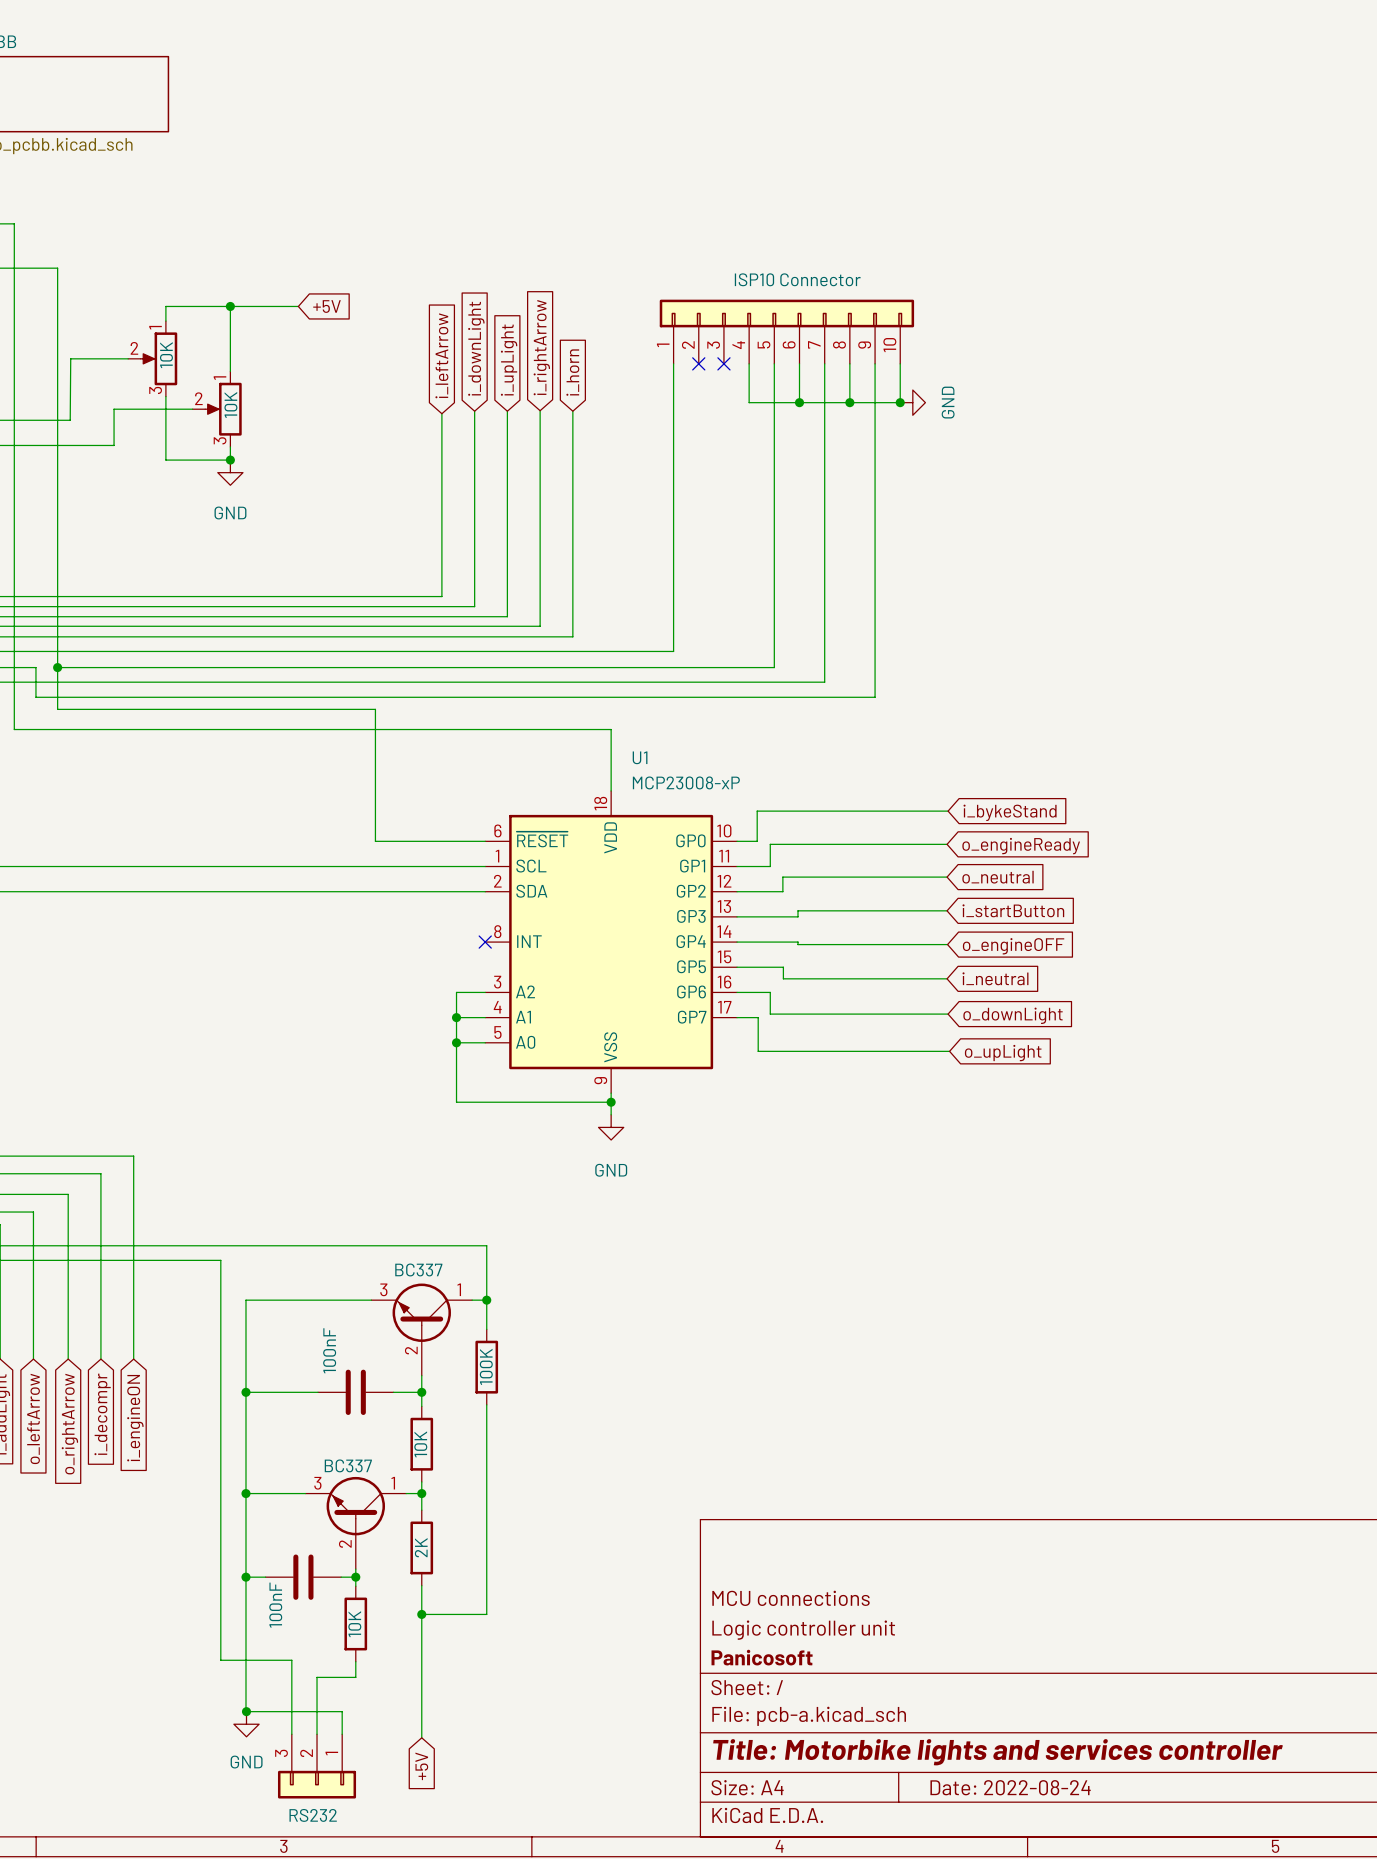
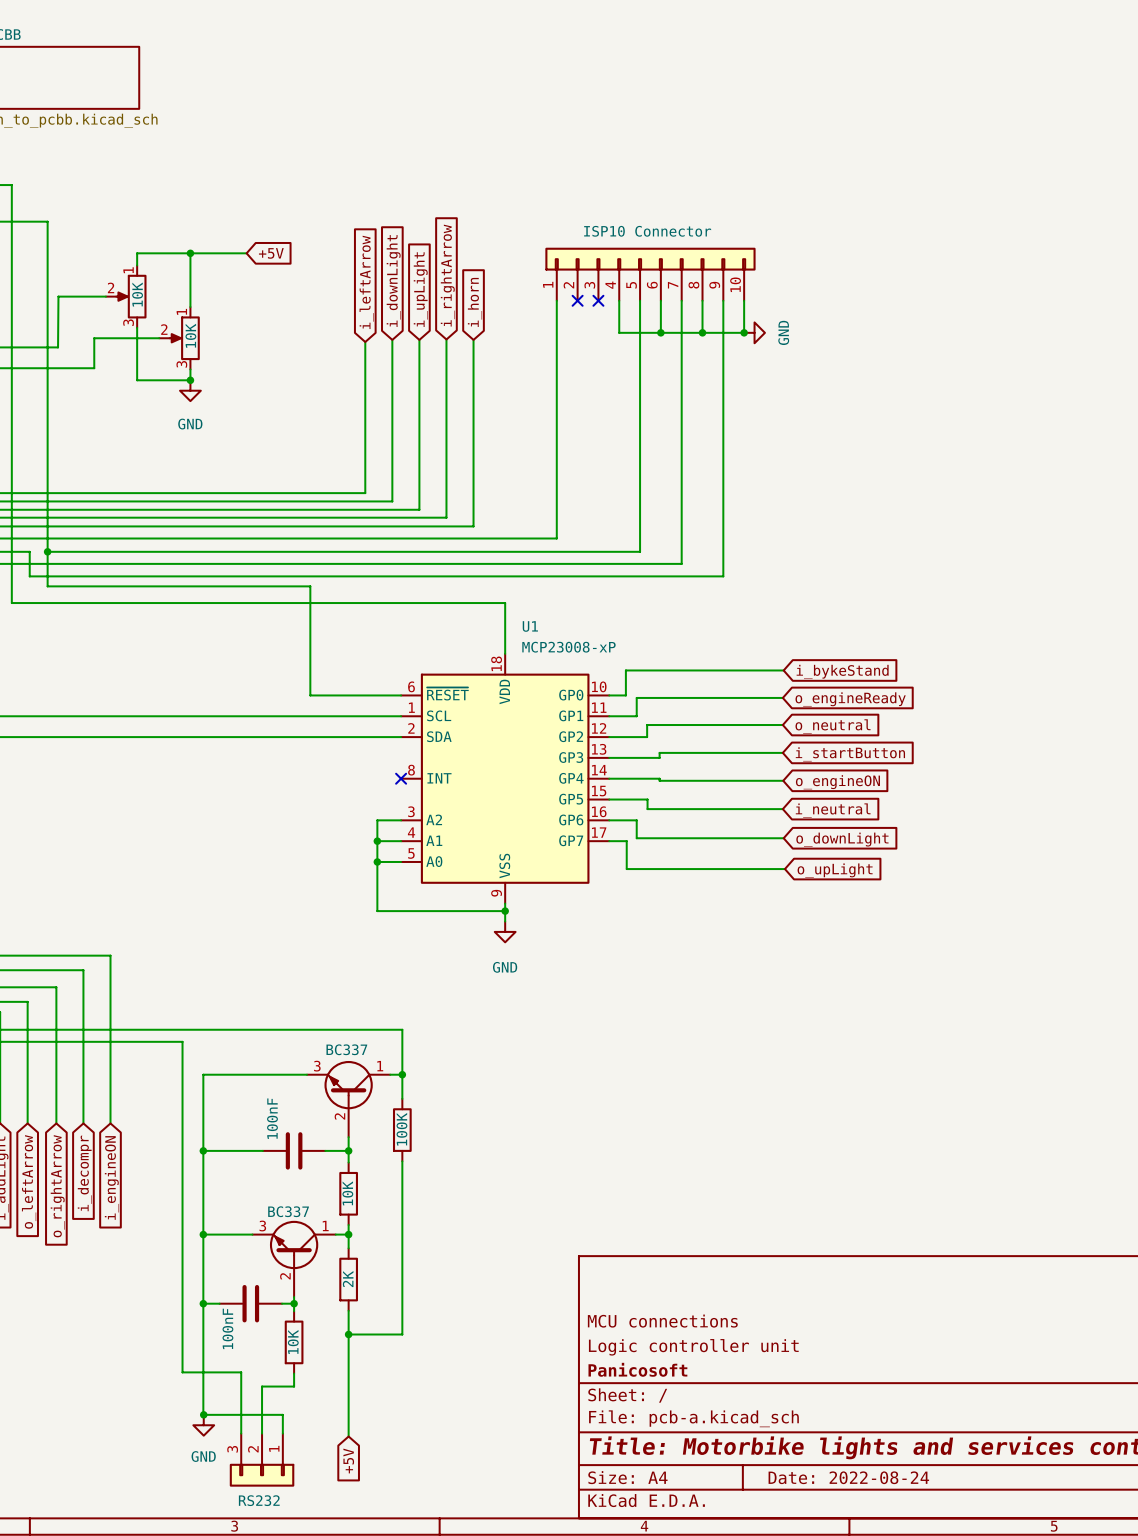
global label: o_engineOFF (1013, 946) -> o_engineON (837, 782)

